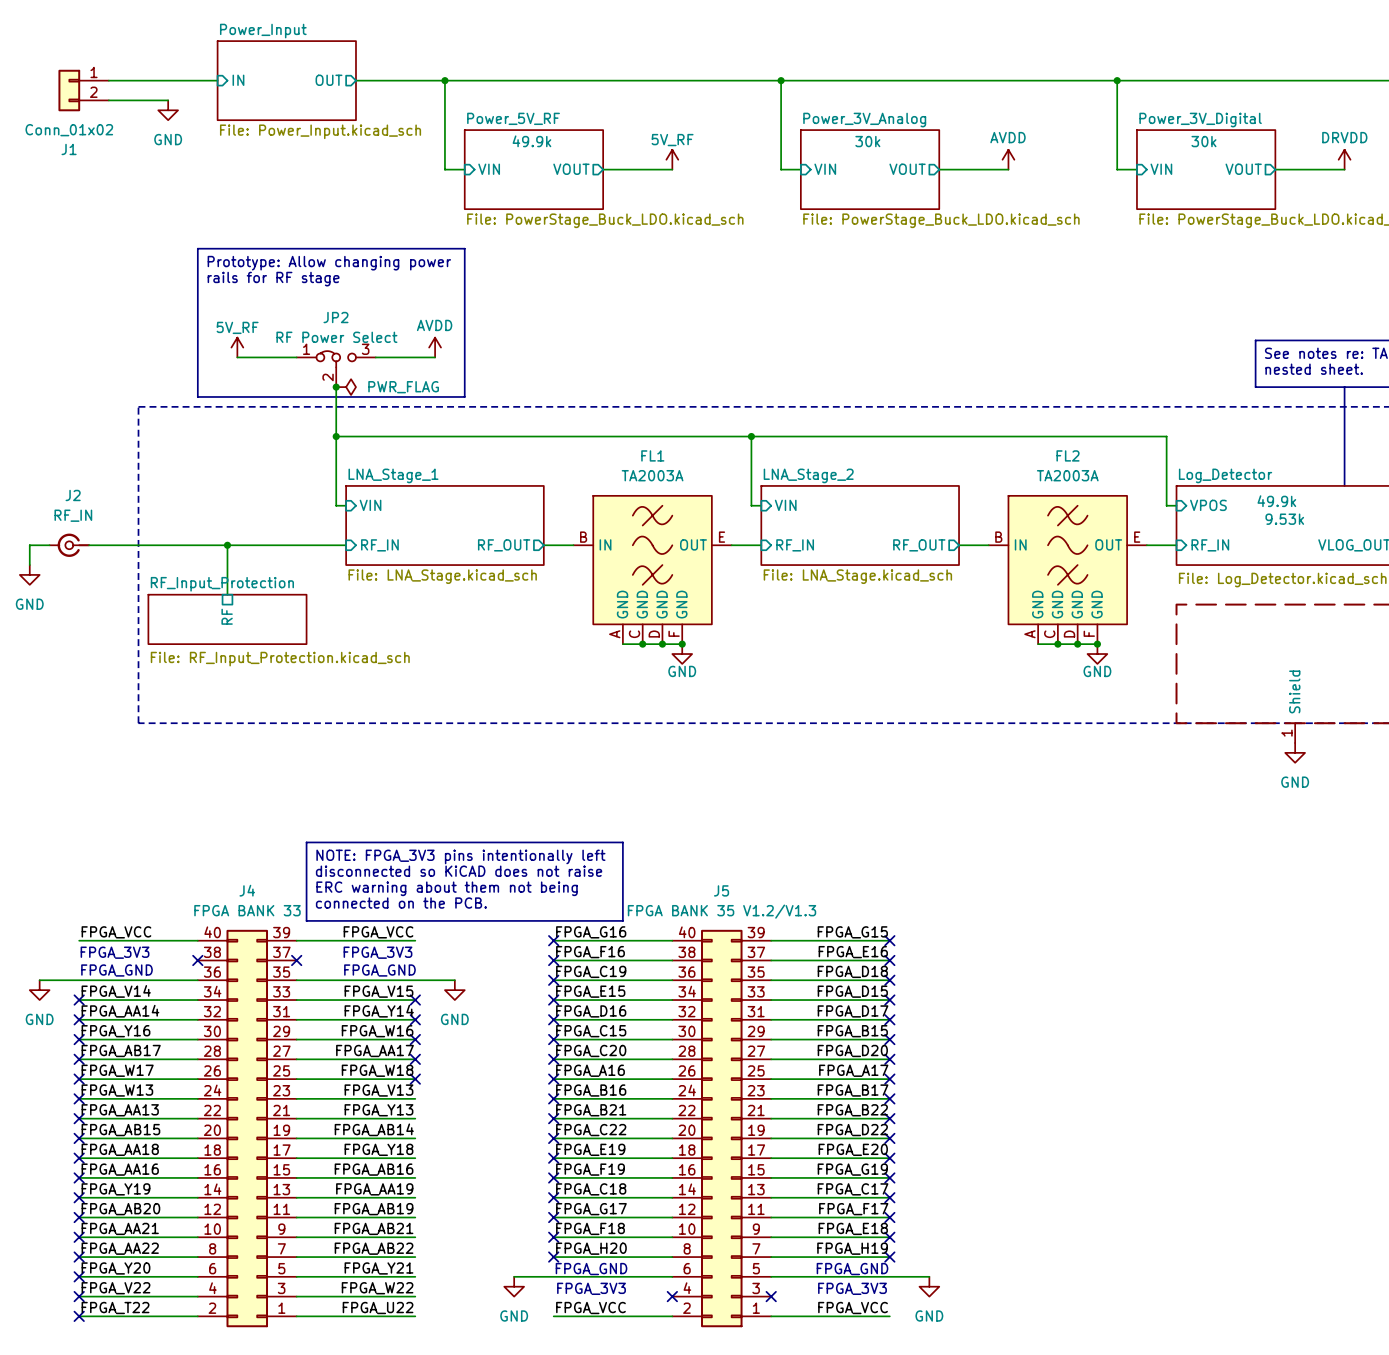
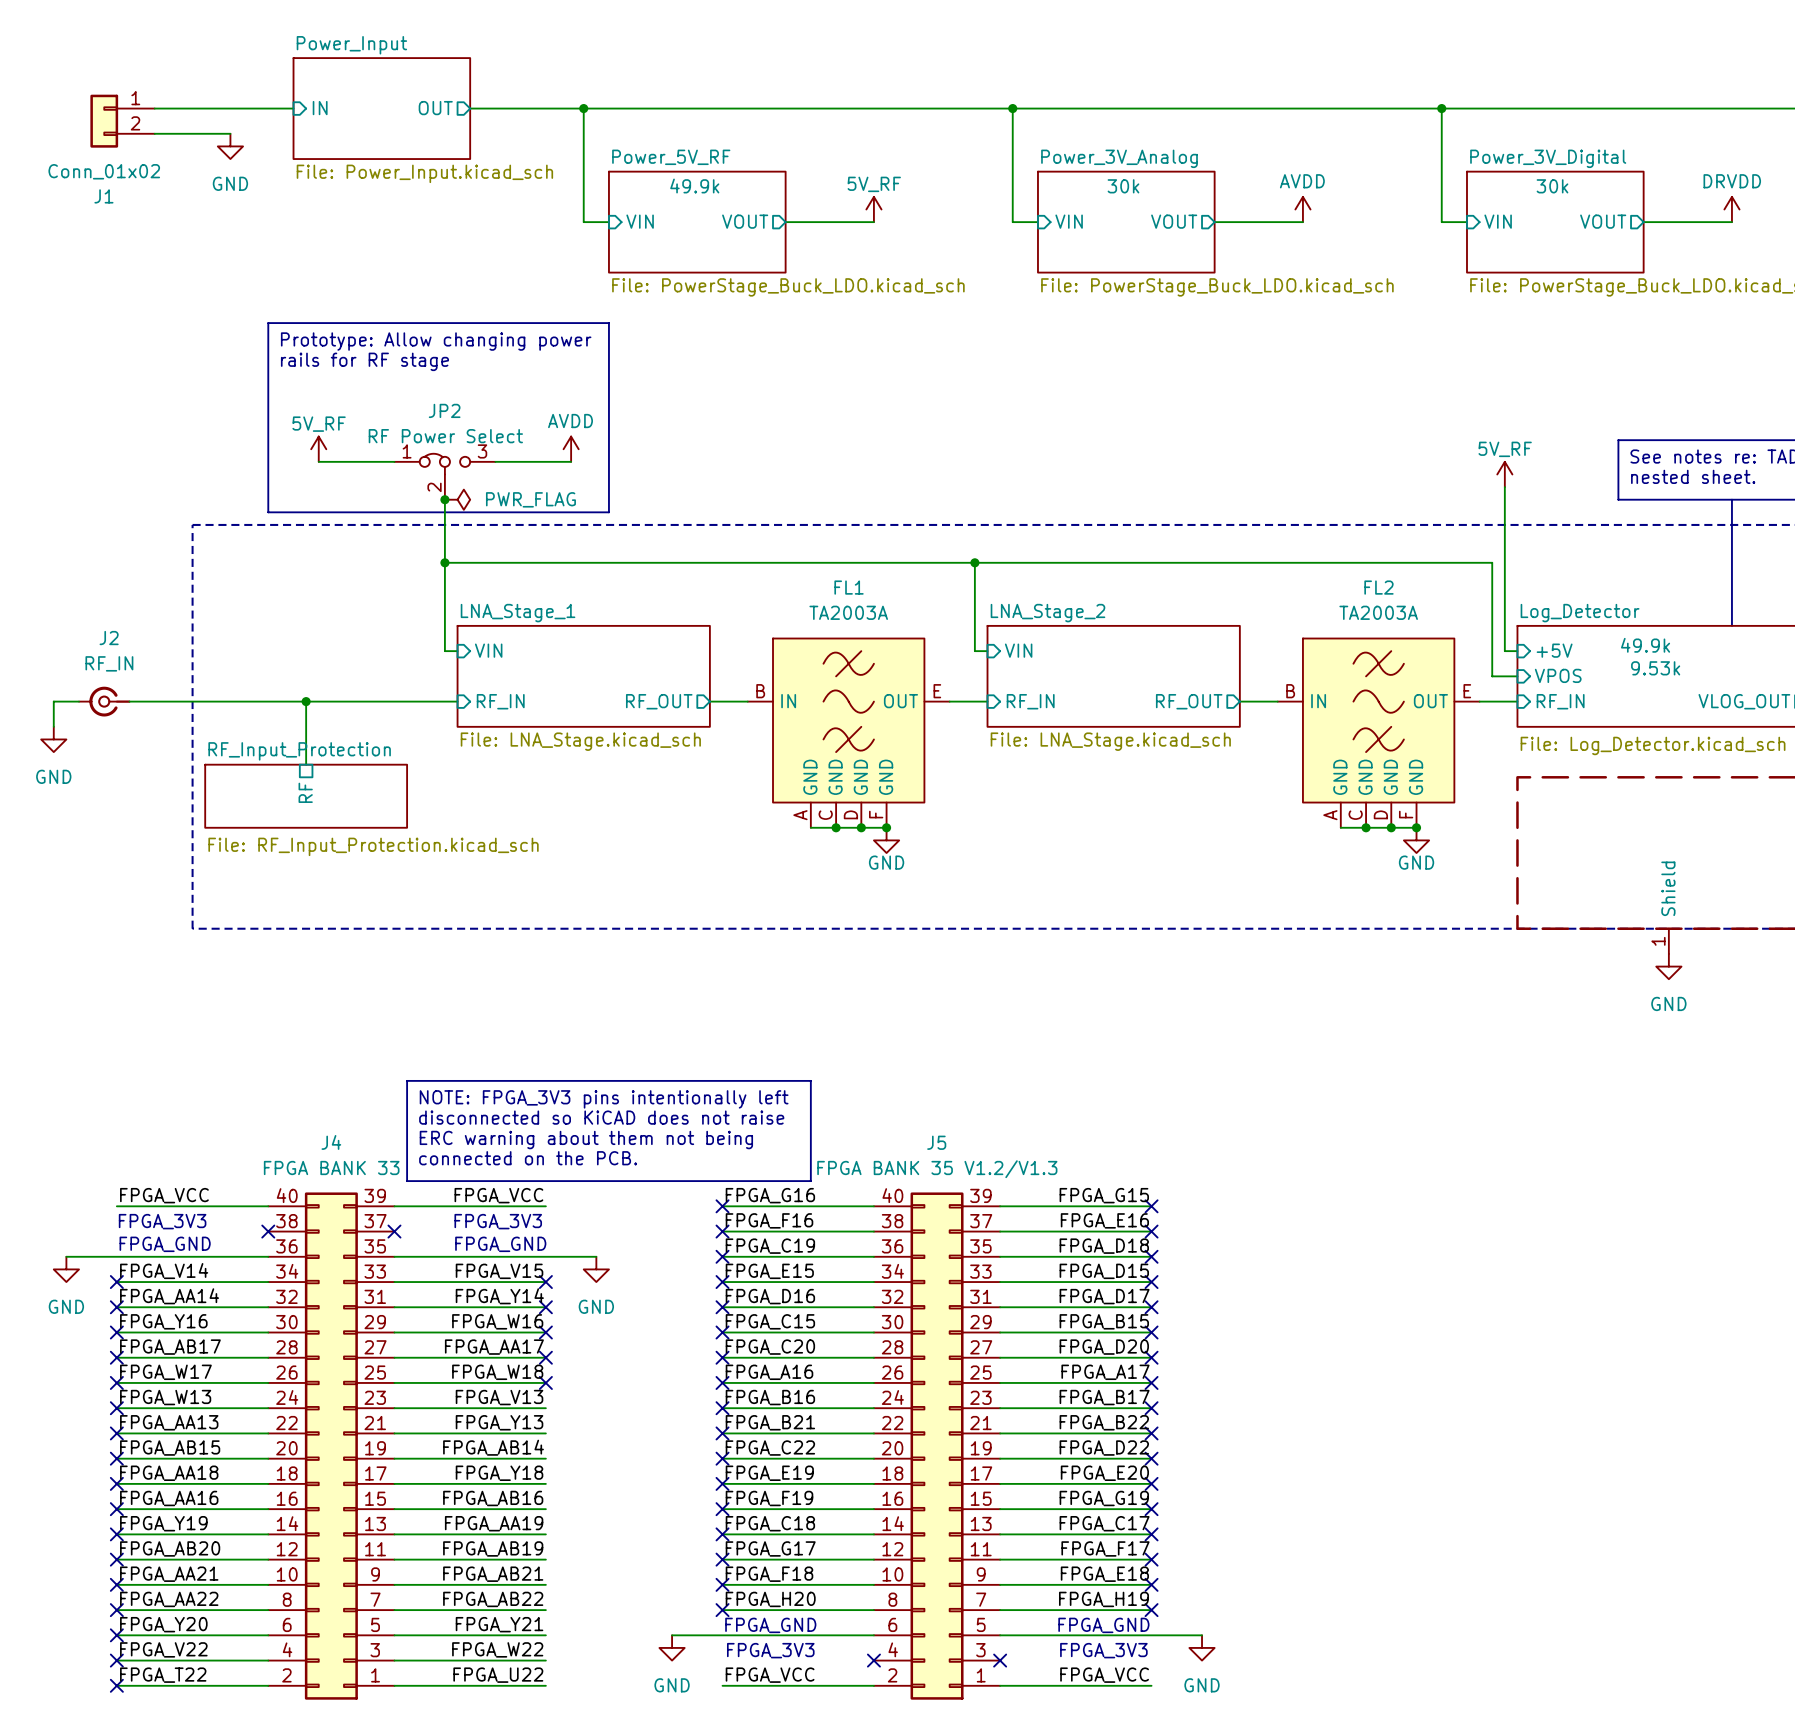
power symbol: none -> 5V_RF (1504, 474)
wire: (1156, 436) (1166, 436) -> (1504, 487) (1504, 562)
wire: none -> (1492, 562) (1492, 676) (1517, 676)
sheet pin: VPOS (1208, 505) -> +5V (1554, 650)
sheet pin: none -> VPOS (1558, 675)

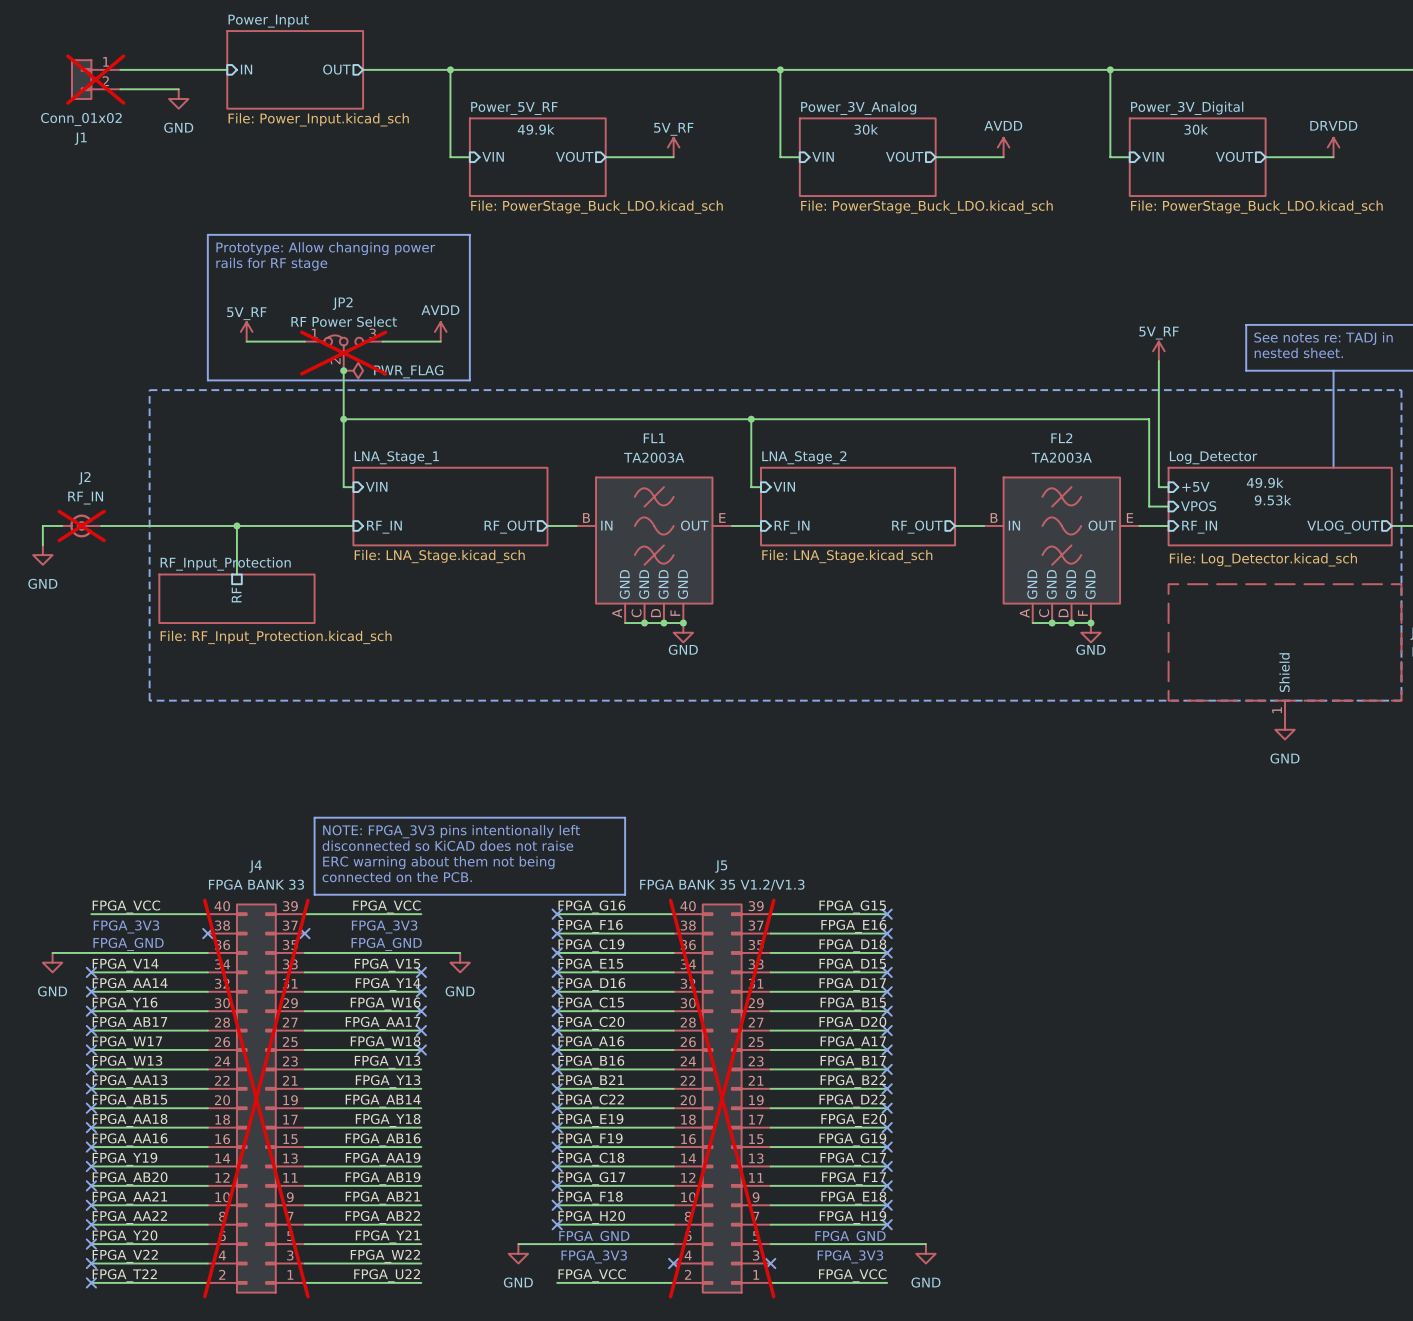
J1 do-not-place cross: none -> (95, 79)
JP2 do-not-place cross: none -> (343, 353)
J2 do-not-place cross: none -> (81, 525)
J4 do-not-place cross: none -> (256, 1098)
J5 do-not-place cross: none -> (722, 1098)

